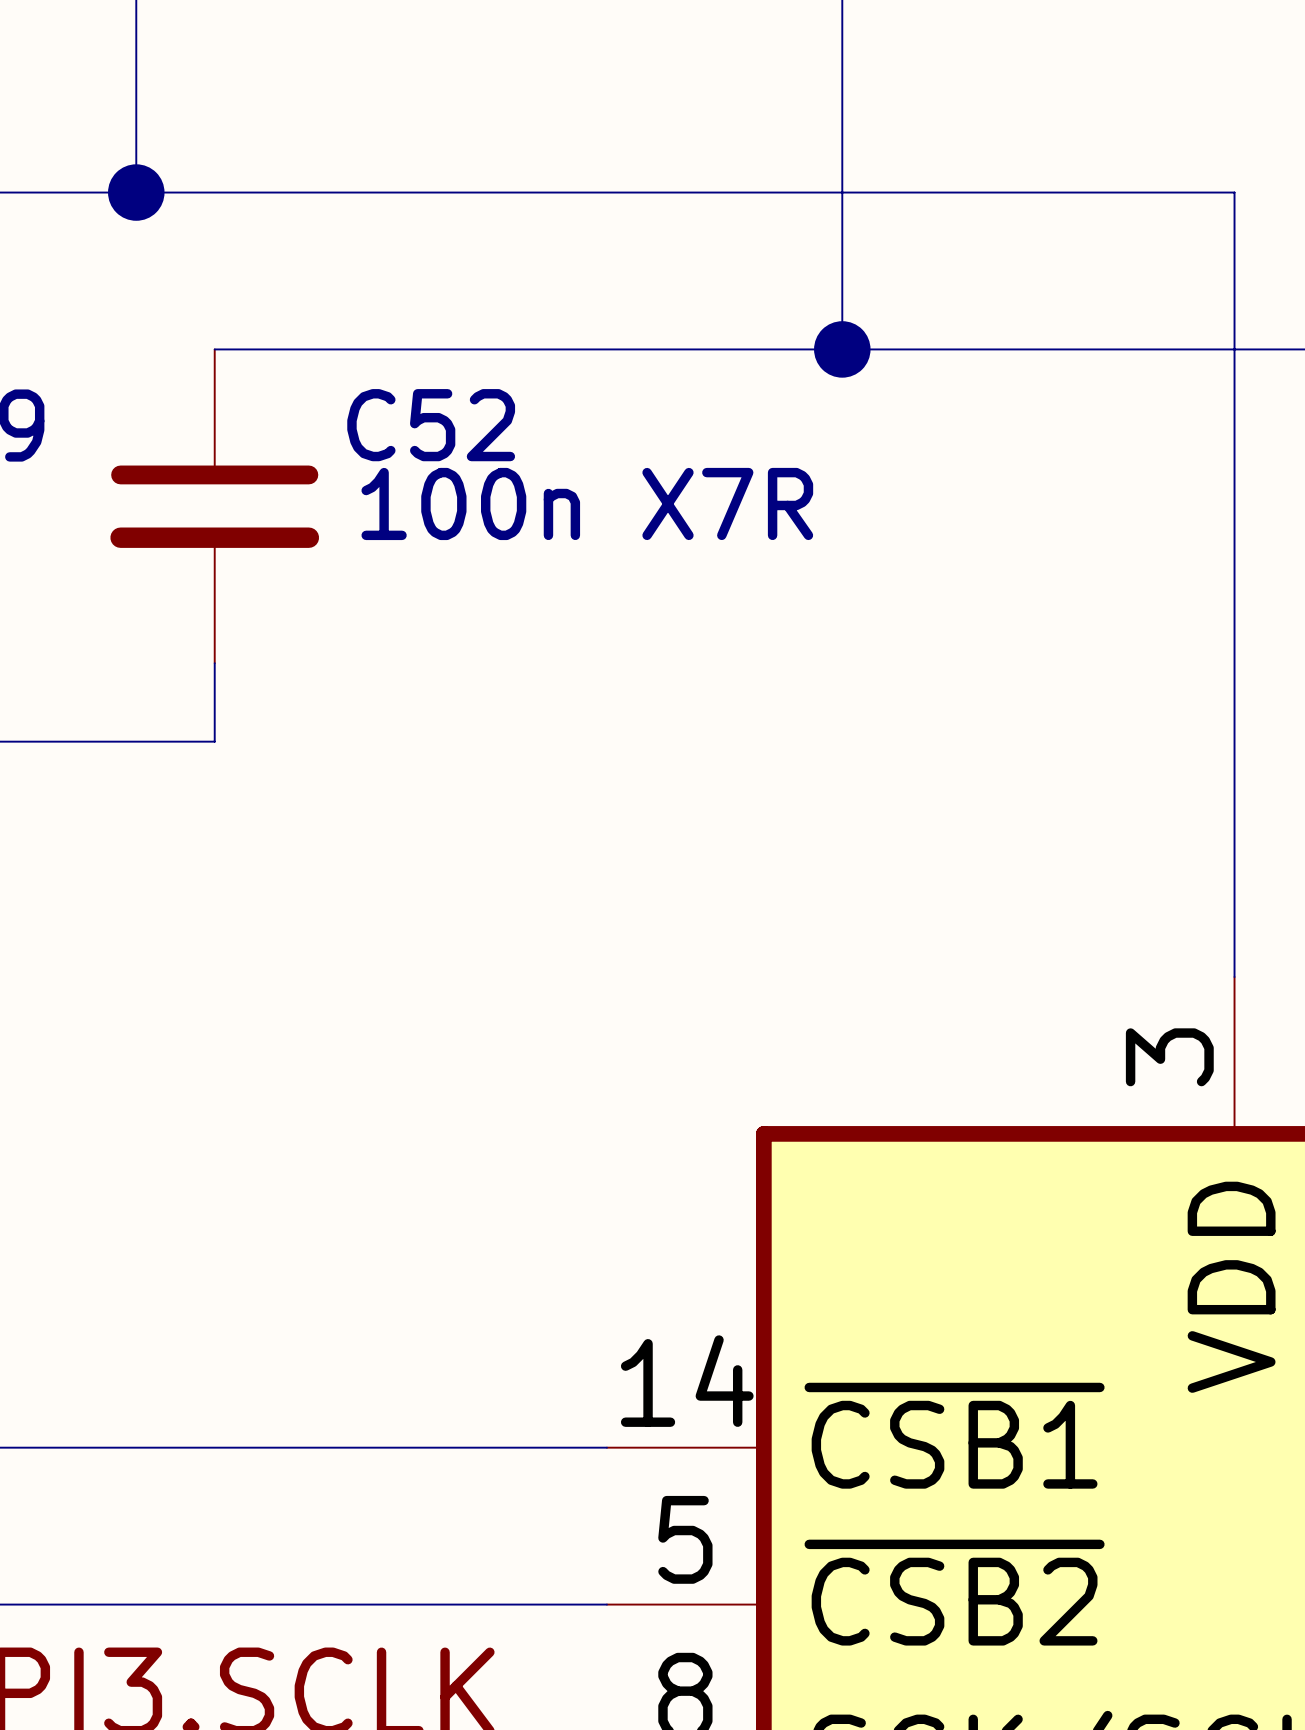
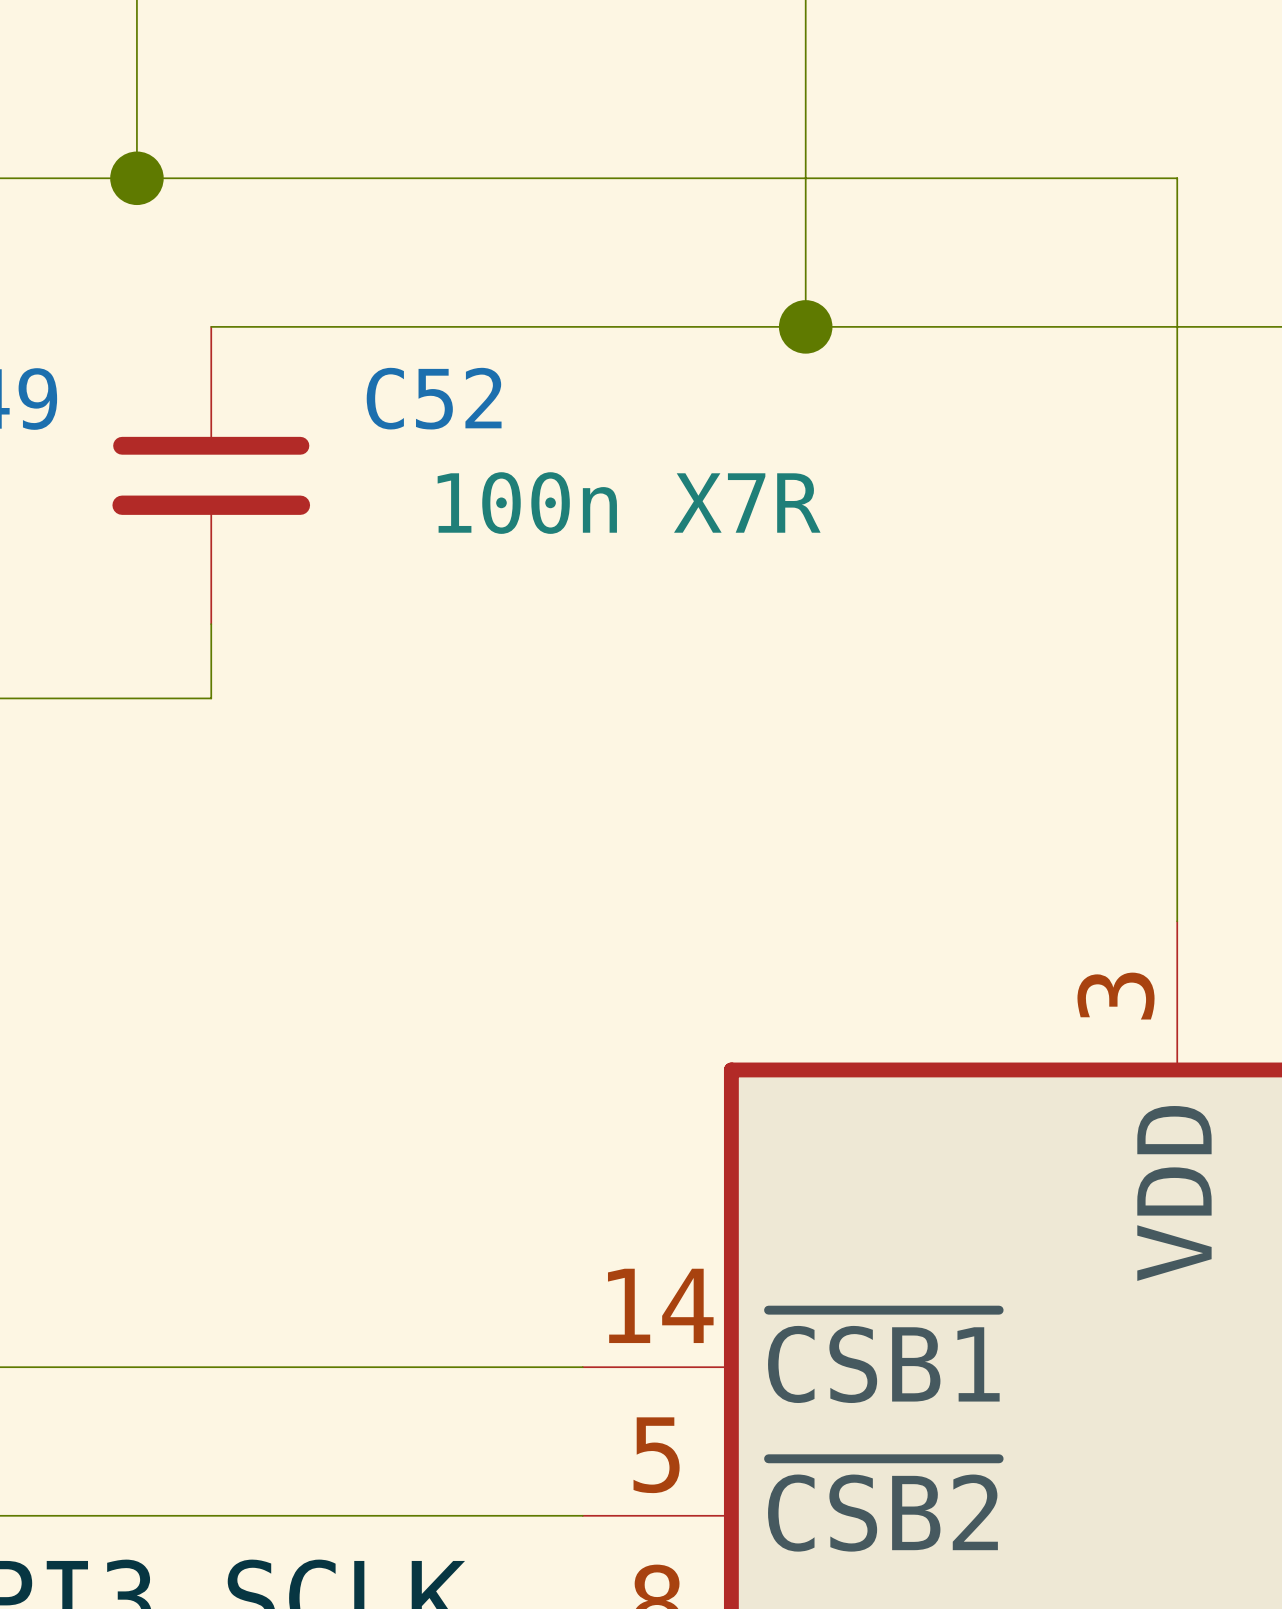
C52 value position: 100n X7R (587, 503) -> 100n X7R (629, 503)

